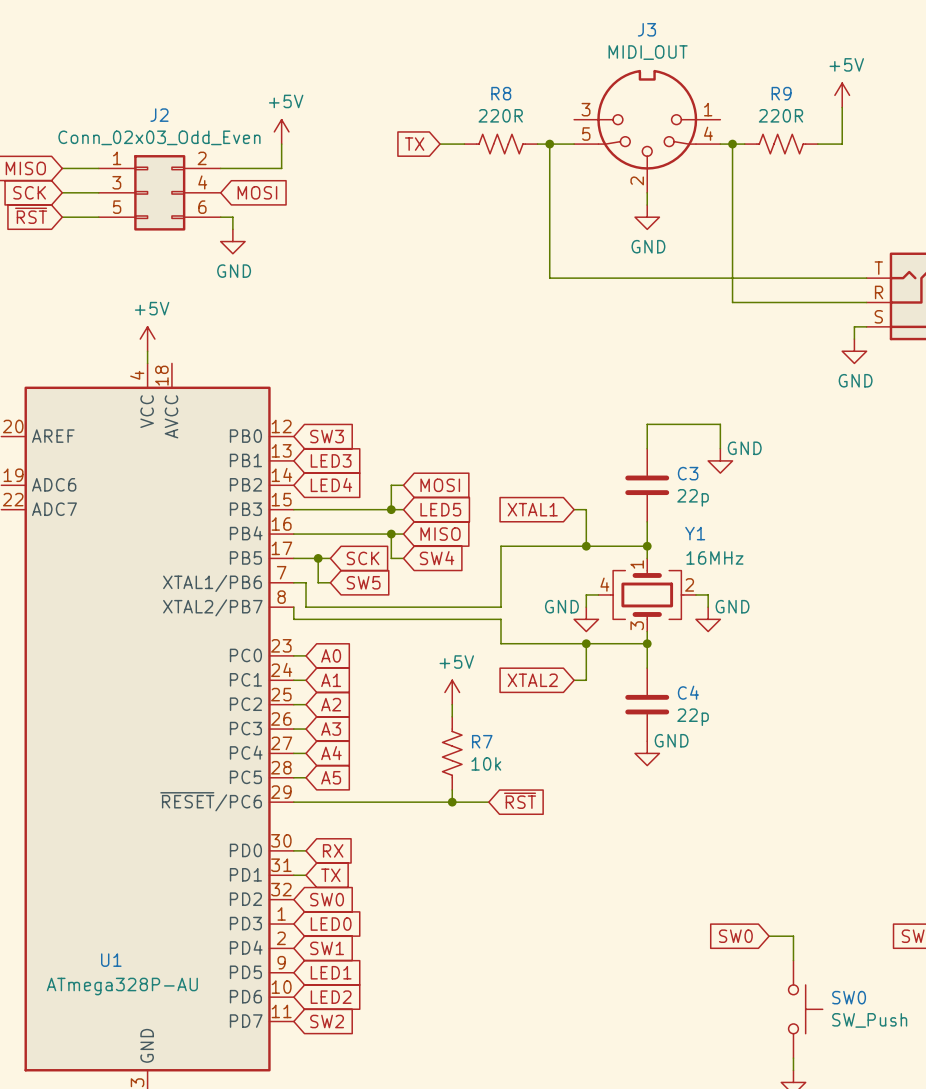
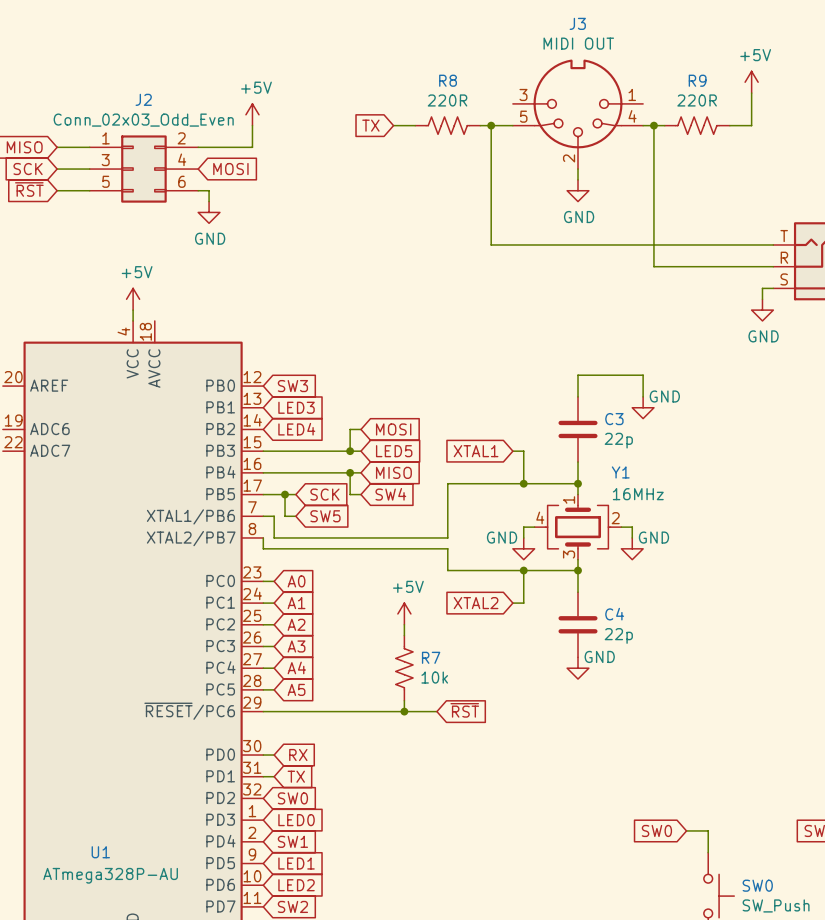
J3 value: MIDI_OUT (648, 52) -> MIDI OUT (578, 43)

